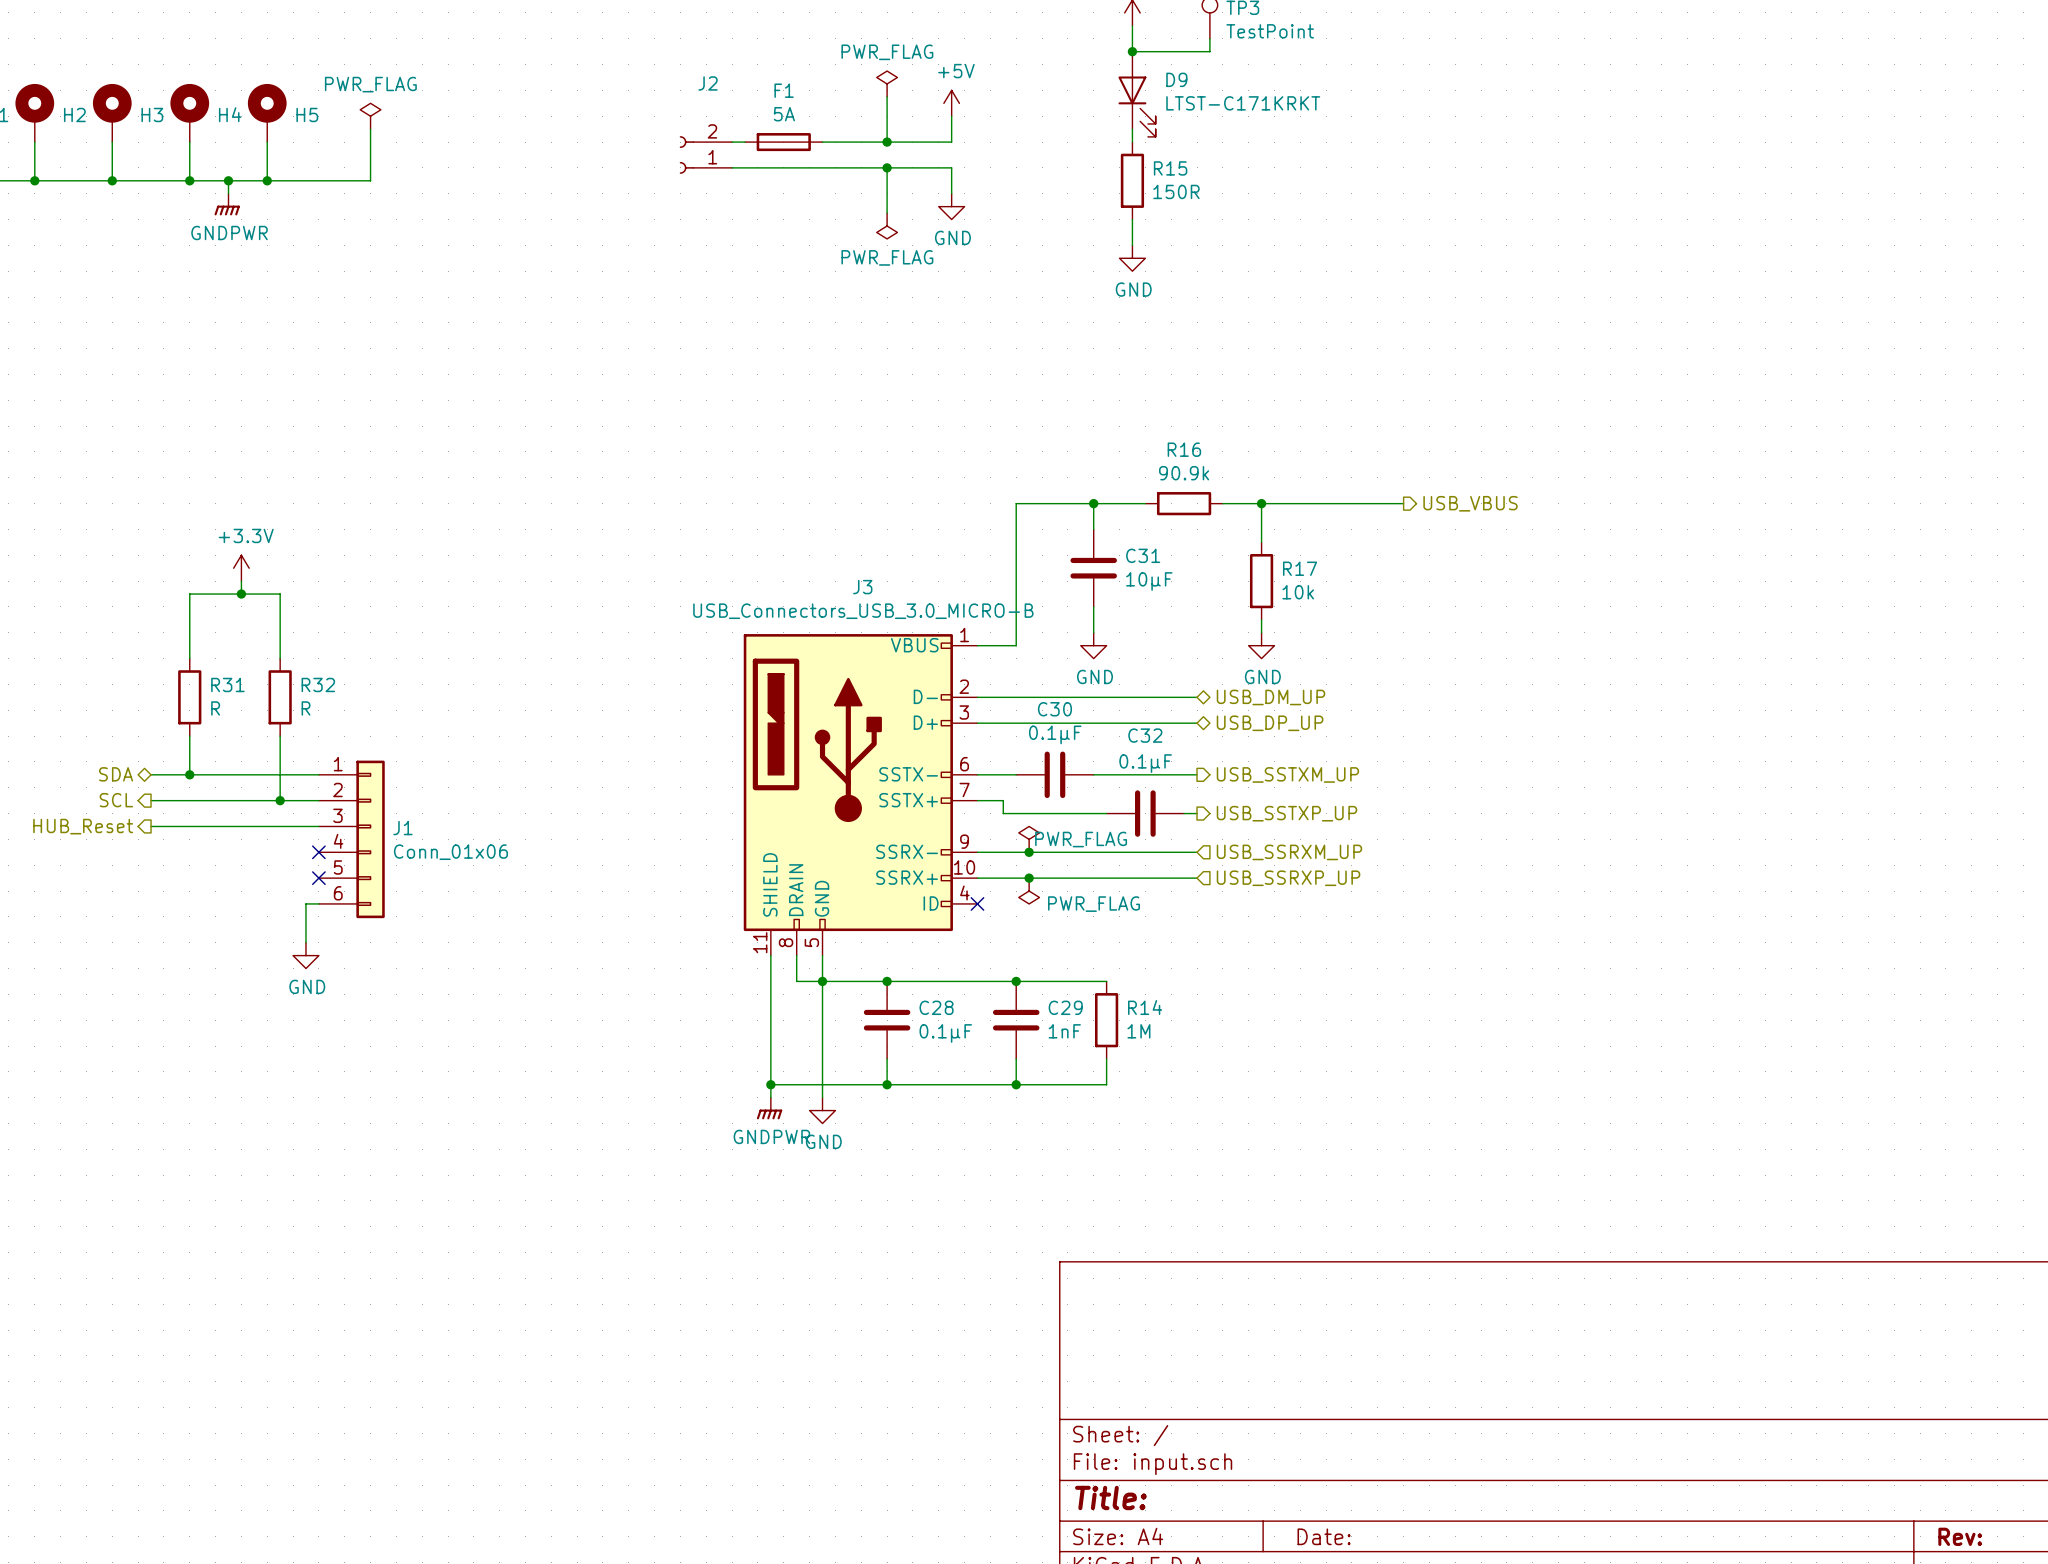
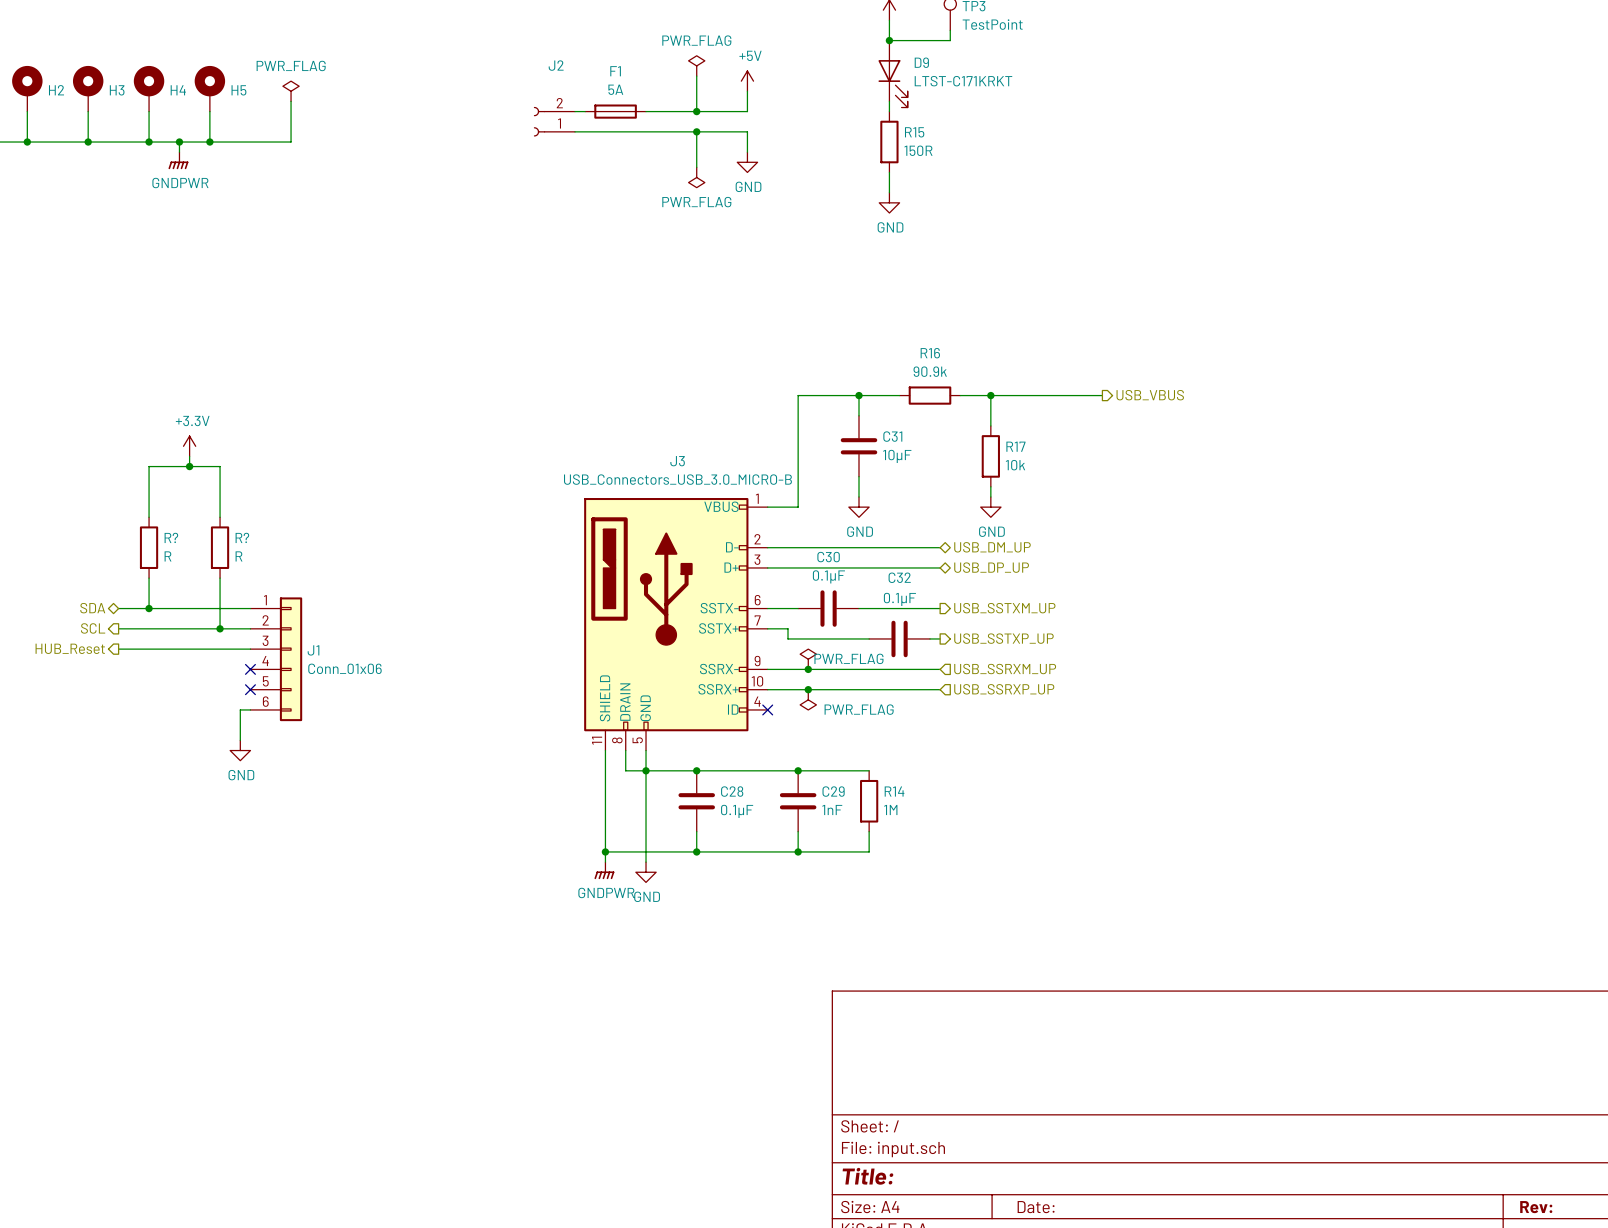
R31 name: R31 (227, 684) -> R? (171, 537)
R32 name: R32 (318, 684) -> R? (242, 537)

